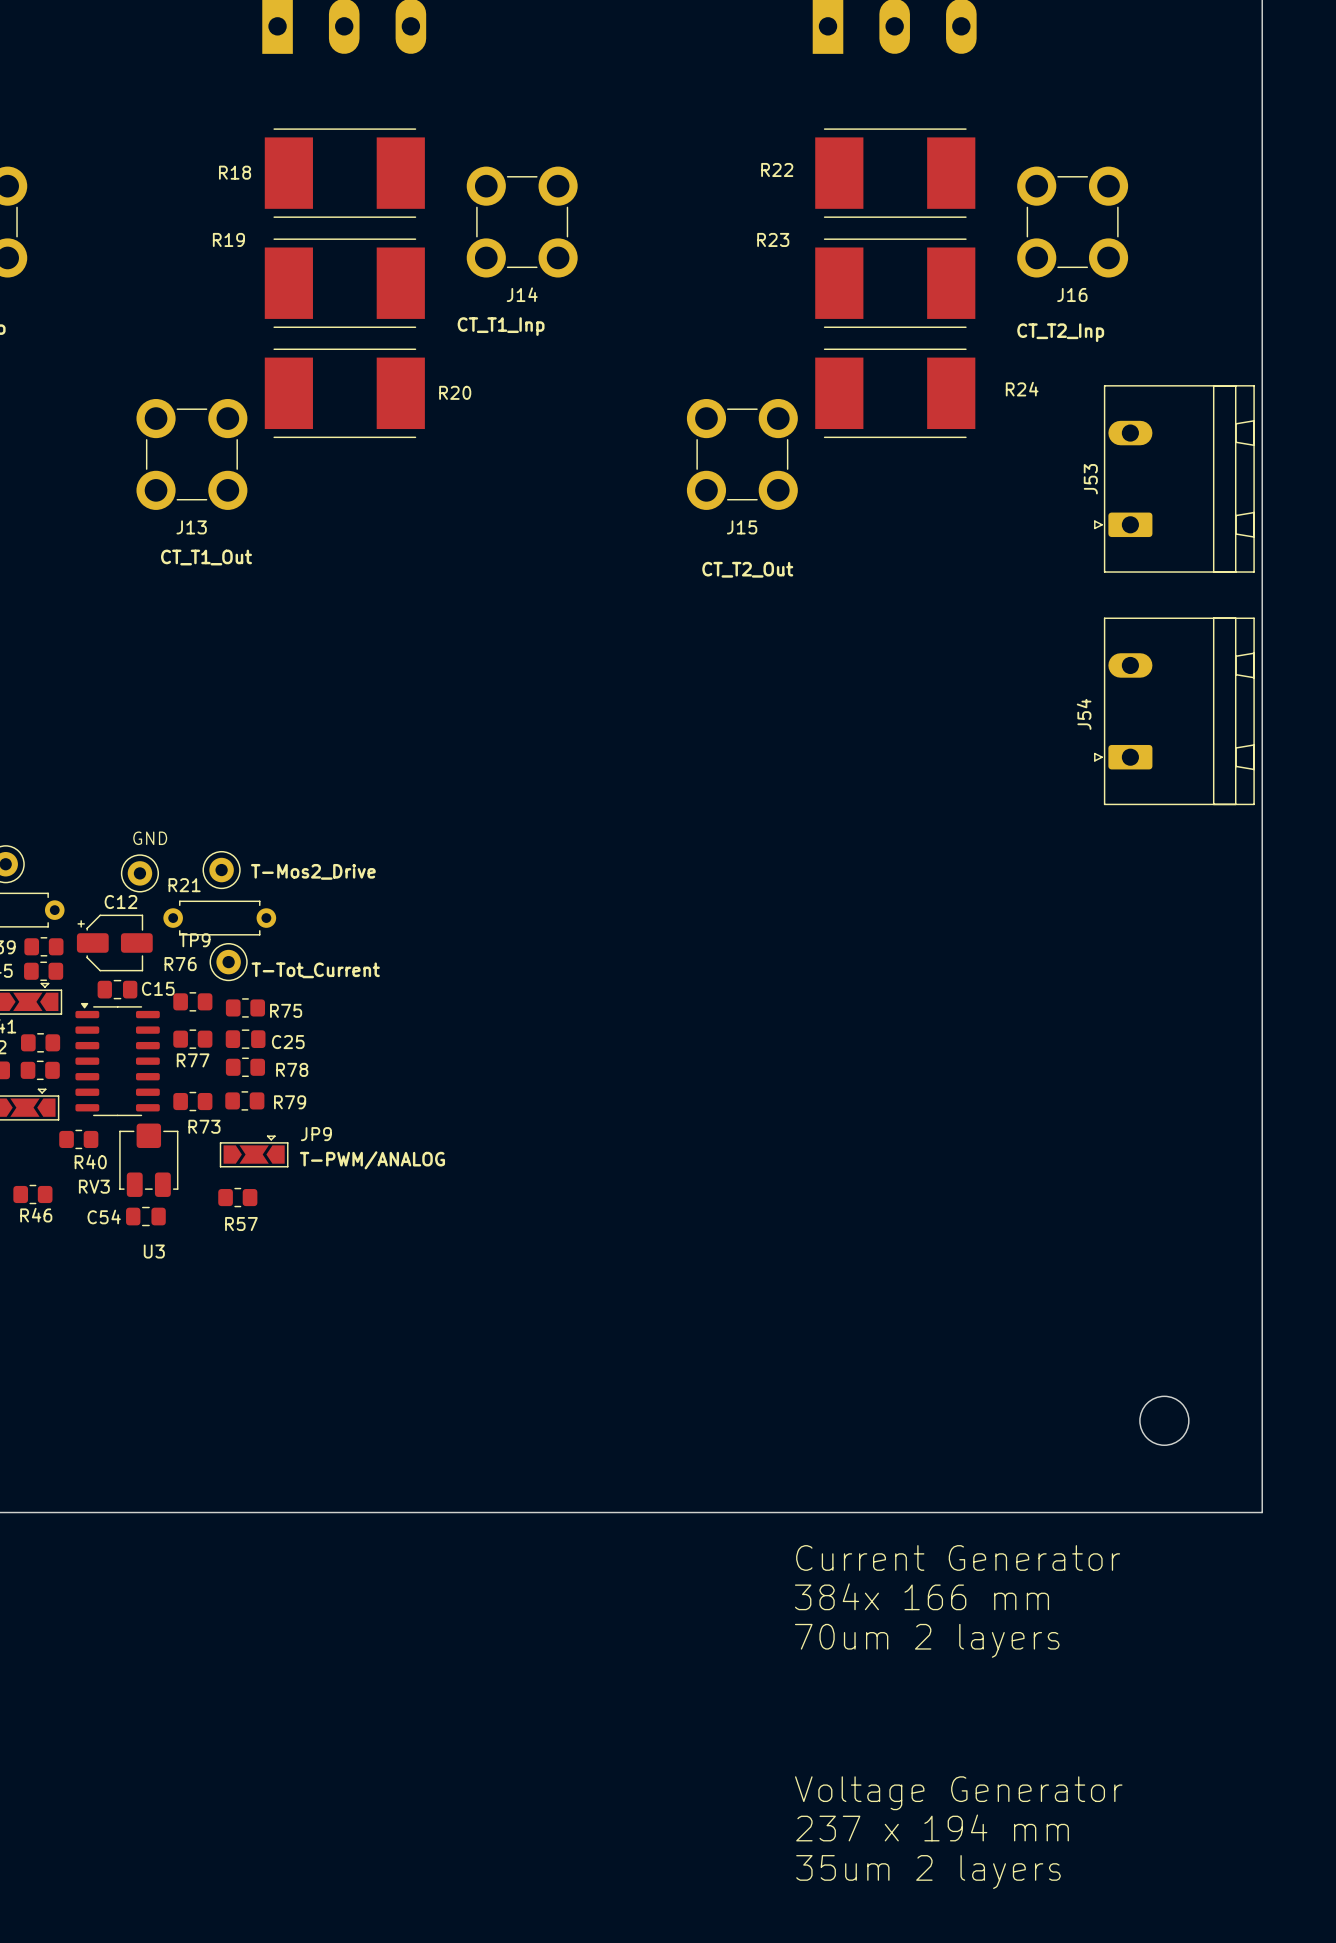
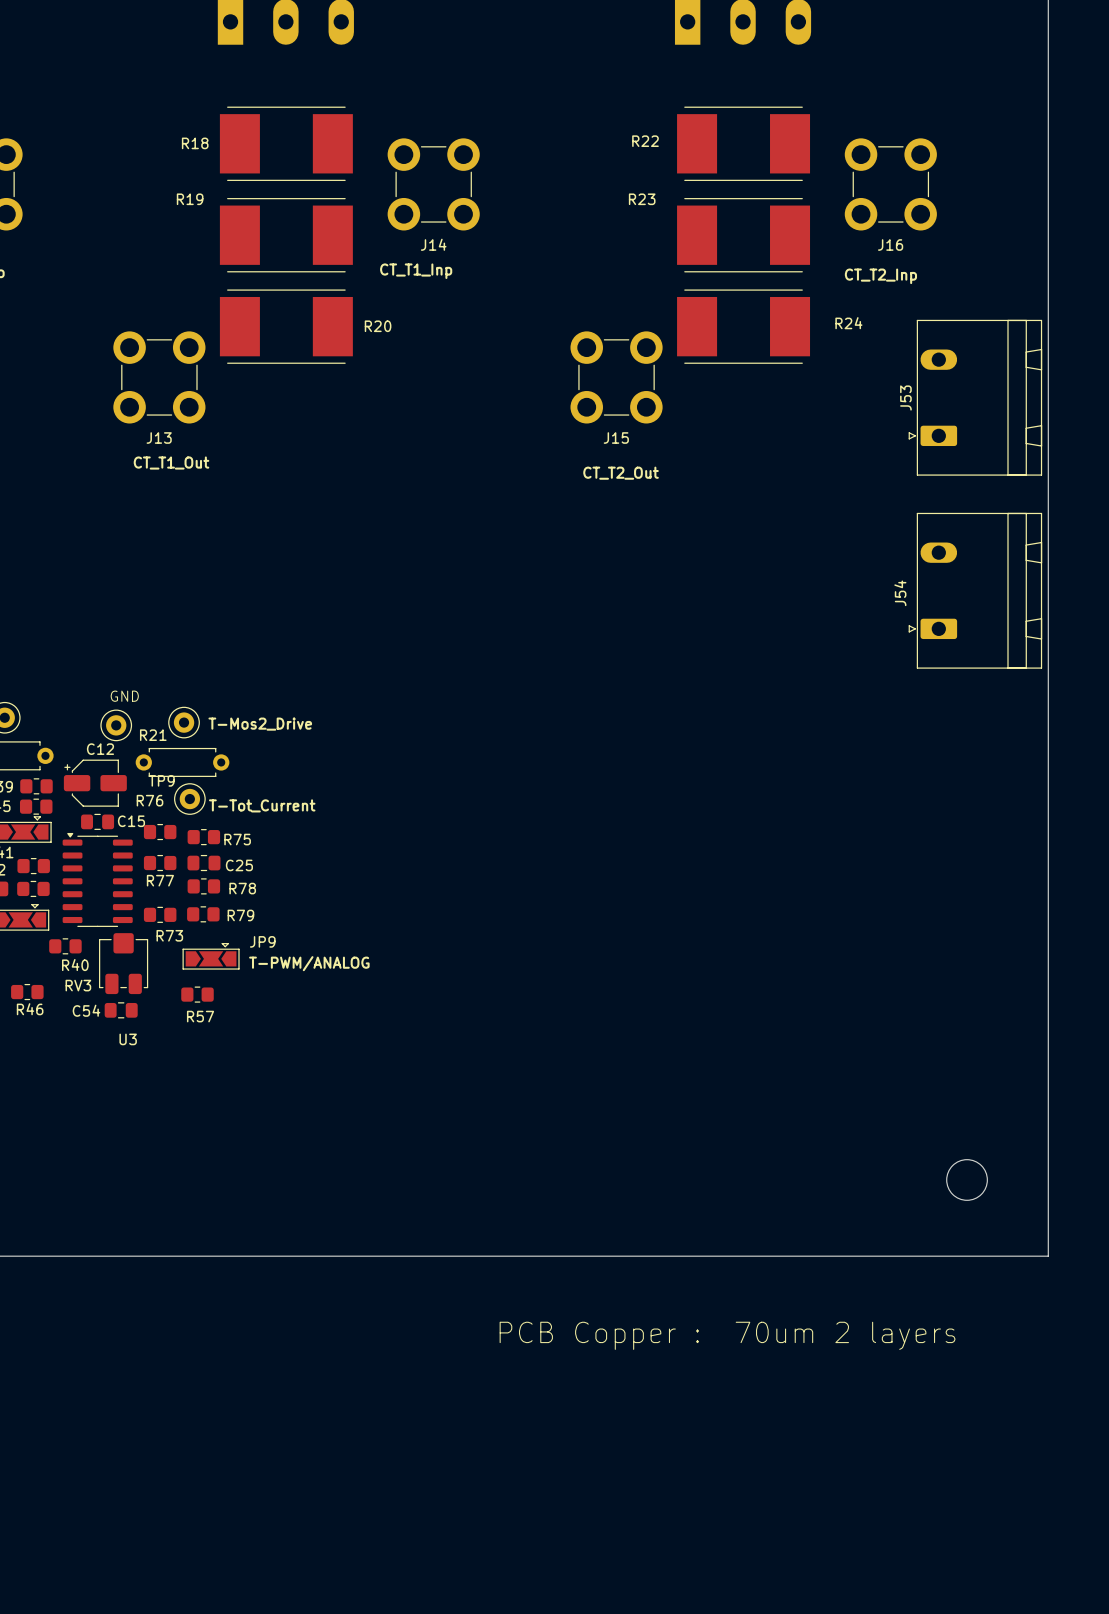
text: Current Generator (958, 1557) -> none
text: 384x 166 mm (922, 1596) -> none
text: 70um 2 layers (927, 1640) -> PCB Copper : 70um 2 layers (727, 1335)
text: Voltage Generator (958, 1793) -> none
text: 237 x 194 mm (932, 1827) -> none
text: 35um 2 layers (928, 1872) -> none

